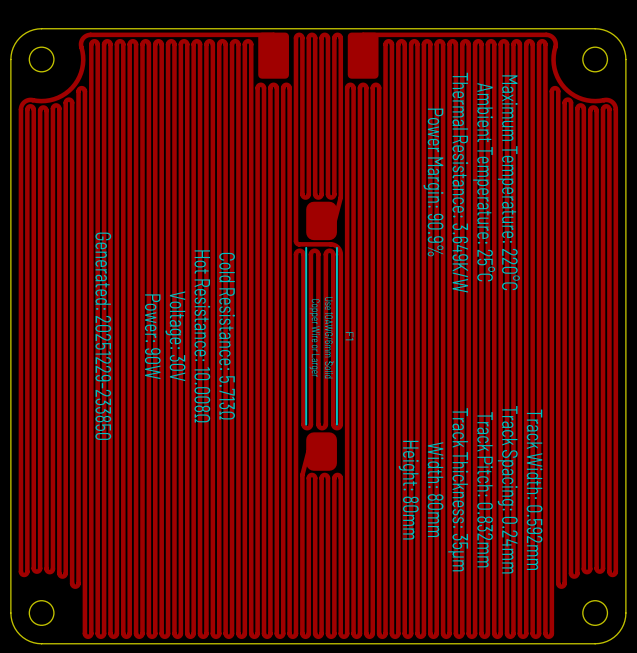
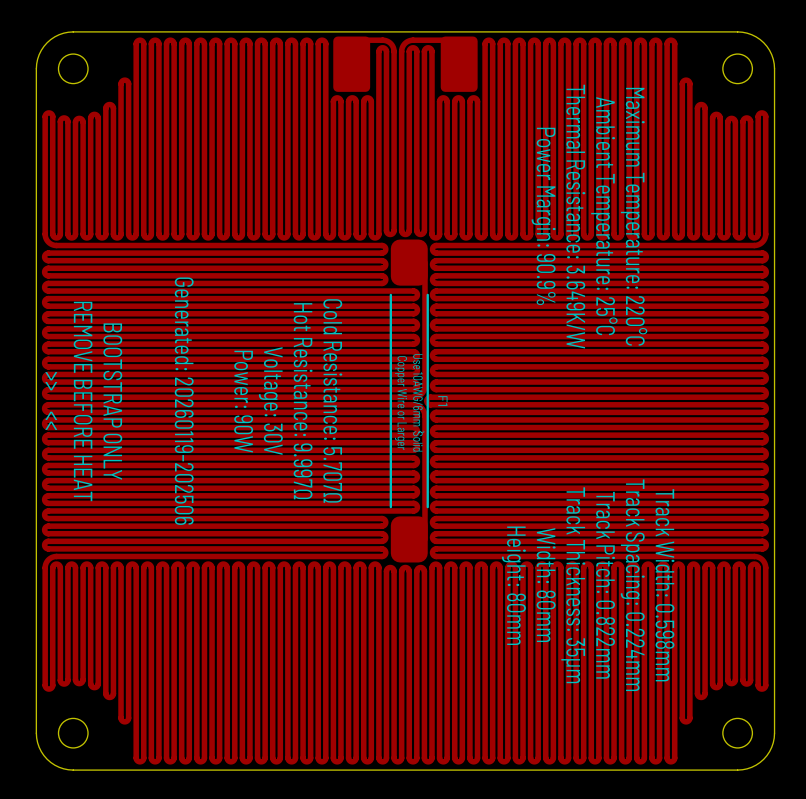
top track: none -> (355, 40) (385, 40) (390, 43) (393, 50) (394, 230) (392, 233) (388, 234) (386, 230) (386, 51) (382, 47) (378, 51) (378, 235) (374, 237) (371, 234) (371, 101) (367, 97) (363, 101) (363, 234) (359, 237) (356, 235) (356, 101) (352, 97) (348, 101) (348, 234) (345, 237) (341, 235) (340, 101) (337, 97) (333, 101) (333, 234) (330, 237) (326, 235) (325, 44) (322, 40) (318, 44) (318, 234) (315, 237) (310, 235) (310, 44) (306, 40) (303, 44) (303, 234) (300, 237) (295, 236) (295, 44) (291, 40) (287, 44) (287, 234) (285, 237) (280, 236) (280, 44) (276, 40) (272, 44) (272, 234) (269, 237) (265, 236) (265, 44) (261, 40) (257, 44) (257, 234) (254, 237) (250, 236) (249, 44) (246, 40) (242, 44) (242, 234) (240, 237) (235, 236) (234, 44) (231, 40) (227, 44) (227, 234) (224, 237) (220, 236) (219, 44) (215, 40) (212, 44) (212, 234) (209, 237) (205, 236) (204, 44) (200, 40) (196, 44) (196, 234) (194, 237) (190, 236) (189, 44) (185, 40) (181, 44) (181, 234) (179, 237) (175, 236) (174, 44) (170, 40) (166, 44) (166, 234) (164, 237) (160, 236) (158, 44) (155, 40) (151, 44) (151, 234) (149, 237) (145, 237) (143, 234) (143, 44) (139, 40) (136, 44) (135, 235) (131, 237) (128, 234) (128, 83) (124, 80) (121, 83) (120, 236) (116, 237) (113, 234) (113, 108) (109, 104) (105, 108) (105, 235) (101, 237) (98, 234) (98, 118) (94, 114) (90, 118) (90, 235) (86, 237) (83, 234) (83, 122) (79, 118) (75, 122) (75, 234) (72, 237) (68, 235) (67, 121) (64, 117) (60, 121) (60, 234) (57, 237) (53, 235) (52, 116) (48, 112) (45, 116) (45, 235) (49, 243) (56, 245) (381, 245) (385, 247) (384, 252) (48, 253) (44, 257) (48, 260) (381, 260) (385, 263) (384, 267) (48, 268) (44, 272) (48, 275) (381, 275) (385, 278) (384, 282) (48, 283) (44, 288) (48, 291) (413, 291) (417, 293) (416, 297) (48, 298) (44, 303) (48, 306) (413, 306) (417, 308) (416, 312) (48, 313) (44, 318) (48, 321) (413, 321) (417, 323) (416, 327) (48, 328) (44, 333) (48, 336) (413, 336) (417, 338) (416, 343) (48, 344) (44, 348) (48, 351) (413, 351) (417, 354) (416, 358) (48, 359) (44, 363) (48, 366) (413, 366) (416, 368) (416, 373) (48, 374) (44, 378) (48, 382) (413, 382) (416, 384) (416, 388) (48, 389) (45, 391) (44, 394) (48, 397) (417, 396) (423, 391) (424, 385) (424, 262)
top track: none -> (455, 40) (411, 40) (404, 43) (401, 49) (401, 230) (404, 234) (409, 230) (409, 51) (412, 47) (416, 51) (416, 230) (420, 234) (424, 230) (424, 51) (428, 47) (431, 51) (431, 234) (434, 237) (439, 234) (439, 101) (443, 97) (447, 101) (447, 235) (450, 237) (454, 234) (454, 101) (458, 97) (462, 101) (462, 235) (466, 237) (469, 234) (469, 101) (473, 97) (477, 101) (477, 234) (480, 237) (484, 235) (485, 44) (487, 40) (491, 40) (492, 44) (492, 234) (495, 237) (500, 234) (500, 44) (502, 40) (506, 40) (507, 44) (507, 234) (510, 237) (515, 234) (515, 44) (517, 40) (521, 40) (523, 44) (523, 234) (525, 237) (530, 234) (530, 44) (532, 40) (536, 40) (538, 44) (538, 234) (540, 237) (545, 234) (545, 44) (547, 40) (551, 40) (553, 44) (553, 234) (555, 237) (559, 237) (560, 234) (560, 44) (562, 40) (566, 40) (568, 44) (568, 234) (570, 237) (574, 237) (576, 234) (576, 44) (578, 40) (581, 40) (583, 44) (583, 234) (586, 237) (589, 237) (591, 234) (592, 40) (596, 40) (598, 44) (598, 234) (601, 237) (604, 237) (606, 234) (607, 40) (612, 40) (614, 44) (614, 234) (616, 237) (620, 237) (621, 234) (623, 40) (626, 40) (629, 44) (629, 234) (631, 237) (634, 237) (636, 234) (637, 41) (642, 40) (644, 44) (644, 234) (646, 237) (650, 237) (651, 234) (653, 41) (657, 40) (659, 44) (659, 234) (661, 237) (665, 237) (667, 234) (667, 41) (672, 40) (674, 44) (676, 237) (680, 237) (682, 234) (682, 81) (686, 80) (689, 83) (689, 234) (692, 237) (695, 237) (697, 234) (697, 106) (702, 104) (705, 107) (705, 234) (708, 237) (712, 234) (712, 116) (716, 114) (720, 117) (720, 234) (723, 237) (727, 234) (727, 121) (732, 118) (735, 121) (735, 234) (739, 237) (742, 234) (743, 121) (746, 118) (750, 120) (750, 234) (754, 237) (758, 234) (758, 116) (761, 112) (765, 115) (765, 234) (763, 241) (758, 244) (436, 245) (432, 249) (436, 253) (763, 253) (766, 257) (762, 260) (436, 260) (432, 264) (436, 268) (763, 268) (766, 272) (762, 275) (436, 275) (432, 279) (436, 283) (762, 283) (766, 287) (762, 290) (436, 291) (432, 294) (436, 298) (762, 298) (766, 302) (762, 306) (436, 306) (432, 309) (436, 313) (762, 313) (766, 317) (762, 321) (436, 321) (432, 325) (436, 328) (762, 328) (766, 332) (763, 336) (436, 336) (432, 340) (436, 344) (762, 344) (766, 347) (763, 351) (436, 351) (432, 355) (436, 359) (762, 359) (766, 362) (763, 366) (436, 366) (432, 370) (436, 374) (762, 374) (766, 377) (763, 381) (436, 382) (432, 385) (436, 389) (762, 389) (766, 392) (764, 396) (430, 397) (426, 401) (430, 404) (764, 405) (766, 409) (762, 412) (436, 412) (432, 416) (436, 419) (763, 420) (766, 424) (762, 427) (436, 427) (432, 431) (436, 435) (762, 435) (766, 439) (762, 442) (436, 442) (432, 446) (436, 450) (762, 450) (766, 454) (762, 457) (436, 457) (432, 461) (436, 465) (762, 465) (766, 469) (762, 473) (436, 473) (432, 476) (436, 480) (762, 480) (766, 483) (763, 488) (436, 488) (432, 492) (436, 495) (762, 495) (766, 500) (762, 503) (436, 503) (432, 507) (436, 510) (762, 511) (766, 515) (762, 518) (436, 518) (432, 522) (436, 526) (762, 526) (766, 529) (762, 533) (436, 533) (432, 537) (436, 541) (762, 541) (766, 544) (763, 548) (436, 548) (432, 552) (436, 556) (758, 557) (764, 562) (765, 567) (765, 687) (761, 689) (758, 685) (758, 567) (754, 564) (750, 567) (750, 680) (747, 684) (742, 680) (742, 566) (739, 564) (735, 567) (735, 679) (731, 683) (727, 679) (727, 567) (724, 564) (720, 566) (720, 683) (716, 687) (712, 683) (712, 567) (709, 564) (705, 566) (705, 693) (701, 697) (697, 693) (697, 567) (694, 564) (690, 566) (689, 718) (686, 721) (682, 718) (682, 567) (678, 564) (674, 566) (674, 758) (671, 761) (667, 758) (667, 567) (663, 564) (659, 567) (659, 758) (656, 761) (651, 758) (651, 567) (648, 564) (644, 567) (644, 758) (641, 761) (636, 758) (636, 567) (633, 564) (629, 567) (629, 758) (626, 761) (621, 758) (621, 567) (618, 564) (614, 567) (614, 758) (611, 761) (606, 758) (606, 567) (603, 564) (598, 567) (598, 758) (595, 761) (591, 758) (591, 567) (587, 564) (583, 567) (583, 758) (580, 761) (576, 758) (576, 567) (572, 564) (568, 567) (568, 758) (565, 761) (560, 758) (560, 567) (557, 564) (553, 567) (553, 758) (550, 761) (545, 758) (545, 567) (542, 564) (538, 567) (538, 758) (535, 761) (530, 758) (530, 567) (527, 564) (523, 567) (523, 758) (520, 761) (515, 758) (515, 567) (512, 564) (507, 567) (507, 758) (505, 761) (500, 758) (500, 567) (496, 564) (492, 567) (492, 758) (489, 761) (485, 758) (485, 567) (481, 564) (477, 567) (477, 758) (474, 761) (469, 758) (469, 567) (466, 564) (462, 567) (462, 758) (459, 761) (454, 758) (454, 567) (451, 564) (447, 567) (447, 758) (444, 761) (439, 758) (439, 567) (436, 564) (431, 567) (431, 758) (429, 761) (426, 761) (424, 758) (424, 571) (421, 567) (416, 571) (416, 758) (414, 761) (410, 761) (409, 758) (409, 571) (406, 567) (401, 571) (401, 758) (399, 761) (395, 761) (394, 758) (394, 571) (390, 567) (386, 571) (386, 758) (382, 761) (378, 758) (378, 567) (376, 564) (371, 567) (371, 758) (368, 761) (365, 761) (363, 758) (363, 567) (360, 564) (356, 567) (356, 758) (353, 761) (350, 761) (348, 758) (348, 567) (345, 564) (340, 567) (340, 758) (338, 761) (335, 761) (333, 758) (333, 567) (330, 564) (325, 567) (325, 758) (323, 761) (319, 761) (318, 758) (318, 567) (315, 564) (310, 567) (310, 758) (308, 761) (304, 761) (303, 758) (303, 567) (300, 564) (295, 567) (295, 758) (293, 761) (289, 761) (287, 758) (287, 567) (285, 564) (280, 567) (280, 758) (278, 761) (274, 761) (272, 758) (272, 567) (270, 564) (266, 564) (265, 567) (265, 758) (263, 761) (259, 761) (257, 758) (257, 567) (255, 564) (251, 564) (249, 567) (249, 758) (247, 761) (244, 761) (242, 758) (242, 567) (239, 564) (236, 564) (234, 567) (234, 758) (233, 761) (229, 761) (227, 758) (227, 567) (224, 564) (221, 564) (219, 567) (219, 758) (217, 761) (214, 761) (212, 758) (212, 567) (209, 564) (206, 564) (204, 567) (204, 758) (202, 761) (198, 761) (196, 758) (196, 567) (194, 564) (191, 564) (189, 567) (187, 761) (184, 761) (181, 758) (181, 567) (179, 564) (175, 564) (174, 567) (173, 760) (168, 761) (166, 758) (166, 567) (164, 564) (160, 564) (158, 567) (157, 760) (153, 761) (151, 758) (151, 567) (149, 564) (145, 564) (143, 567) (142, 760) (138, 761) (136, 758) (136, 567) (134, 564) (130, 564) (128, 567) (127, 720) (123, 721) (121, 718) (121, 567) (118, 564) (115, 564) (113, 567) (112, 695) (108, 697) (105, 694) (105, 567) (102, 564) (98, 567) (97, 685) (94, 687) (90, 684) (90, 567) (87, 564) (83, 567) (82, 680) (79, 683) (75, 680) (75, 567) (71, 564) (67, 567) (67, 680) (64, 684) (60, 681) (60, 567) (56, 564) (52, 567) (52, 685) (49, 689) (45, 686) (45, 566) (47, 560) (52, 557) (381, 556) (385, 552) (381, 548) (47, 548) (44, 545) (48, 541) (381, 541) (385, 537) (381, 533) (48, 533) (44, 529) (47, 526) (381, 526) (385, 522) (381, 518) (48, 518) (44, 515) (46, 511) (413, 510) (417, 507) (413, 503) (47, 503) (44, 499) (48, 495) (413, 495) (417, 492) (413, 488) (47, 488) (44, 484) (48, 480) (413, 480) (417, 476) (413, 473) (47, 473) (44, 469) (48, 465) (413, 465) (417, 461) (413, 457) (47, 457) (44, 454) (48, 450) (413, 450) (417, 446) (413, 442) (48, 442) (44, 438) (47, 435) (413, 435) (417, 431) (413, 427) (48, 427) (44, 424) (47, 420) (413, 419) (417, 416) (413, 412) (48, 412) (44, 409) (46, 405) (417, 405) (422, 409) (424, 416) (424, 539)
top track: (273, 55) (273, 34) (88, 35) (81, 41) (82, 68) (72, 87) (58, 97) (45, 100) (27, 100) (21, 107) (20, 572) (24, 574) (27, 571) (27, 109) (30, 106) (33, 109) (33, 568) (36, 571) (40, 568) (40, 110) (43, 107) (46, 110) (46, 568) (49, 572) (52, 569) (52, 108) (56, 105) (59, 108) (59, 573) (62, 576) (65, 573) (65, 102) (69, 99) (72, 102) (72, 583) (75, 586) (78, 583) (78, 91) (81, 88) (84, 90) (84, 633) (86, 636) (89, 636) (91, 633) (91, 42) (95, 41) (97, 44) (97, 633) (99, 636) (102, 636) (104, 633) (104, 42) (108, 41) (110, 44) (110, 633) (112, 636) (115, 636) (116, 633) (117, 42) (121, 41) (123, 44) (123, 633) (125, 636) (127, 636) (129, 633) (130, 42) (134, 41) (136, 44) (136, 633) (138, 636) (142, 633) (143, 42) (146, 41) (148, 44) (148, 633) (150, 636) (155, 633) (156, 42) (159, 41) (161, 44) (161, 633) (163, 636) (168, 633) (169, 42) (172, 41) (174, 44) (174, 633) (176, 636) (180, 633) (182, 41) (185, 41) (187, 44) (187, 633) (189, 636) (193, 633) (195, 41) (198, 41) (200, 44) (200, 633) (202, 636) (206, 633) (207, 41) (211, 41) (212, 44) (212, 633) (215, 636) (219, 633) (219, 44) (220, 41) (223, 41) (225, 44) (225, 633) (228, 636) (232, 633) (232, 44) (233, 41) (237, 41) (238, 44) (238, 633) (240, 636) (244, 633) (244, 44) (246, 41) (251, 44) (251, 633) (254, 636) (257, 633) (257, 88) (260, 84) (264, 88) (264, 633) (266, 636) (270, 633) (270, 88) (272, 84) (276, 88) (276, 633) (279, 636) (283, 633) (283, 88) (286, 84) (289, 88) (289, 633) (292, 636) (295, 633) (295, 254) (298, 250) (303, 254) (303, 425) (307, 428) (310, 424) (310, 254) (314, 250) (318, 254) (318, 424) (322, 428) (325, 424) (325, 254) (329, 250) (333, 254) (333, 424) (337, 428) (340, 424) (340, 251) (333, 244) (298, 244) (296, 241) (295, 38) (298, 34) (302, 38) (302, 194) (305, 197) (308, 194) (308, 37) (312, 34) (315, 38) (315, 194) (318, 197) (321, 194) (321, 37) (325, 34) (327, 38) (327, 194) (331, 197) (334, 194) (334, 38) (337, 34) (340, 37) (340, 197) (334, 220) (321, 220) -> none
top track: (363, 55) (363, 34) (548, 35) (555, 41) (554, 68) (564, 87) (582, 99) (607, 100) (614, 104) (615, 572) (611, 574) (609, 571) (609, 109) (606, 106) (603, 109) (603, 568) (599, 571) (596, 568) (596, 110) (593, 107) (590, 110) (590, 568) (587, 572) (583, 569) (583, 108) (580, 105) (577, 108) (577, 573) (574, 576) (571, 573) (571, 102) (567, 99) (564, 102) (564, 583) (561, 586) (558, 584) (558, 91) (554, 88) (551, 91) (551, 633) (549, 636) (546, 635) (545, 44) (543, 41) (539, 44) (538, 635) (534, 636) (532, 633) (532, 44) (530, 41) (527, 41) (526, 44) (525, 635) (521, 636) (519, 633) (519, 44) (518, 41) (515, 41) (513, 44) (512, 635) (509, 636) (507, 633) (507, 44) (505, 41) (500, 44) (499, 635) (496, 636) (494, 633) (494, 44) (492, 41) (487, 44) (486, 635) (483, 636) (481, 633) (481, 44) (479, 41) (475, 44) (474, 635) (470, 636) (468, 633) (468, 44) (466, 41) (462, 44) (460, 636) (457, 636) (455, 633) (455, 44) (453, 41) (449, 44) (448, 636) (444, 636) (443, 633) (443, 44) (440, 41) (436, 44) (435, 636) (432, 636) (430, 633) (430, 44) (427, 41) (423, 44) (423, 633) (422, 636) (419, 636) (417, 633) (417, 44) (415, 41) (411, 44) (411, 633) (409, 636) (406, 636) (404, 633) (404, 44) (402, 41) (398, 44) (398, 633) (396, 636) (391, 633) (391, 44) (389, 41) (385, 44) (385, 633) (383, 636) (379, 633) (379, 88) (376, 84) (372, 88) (372, 633) (370, 636) (366, 633) (366, 88) (363, 84) (359, 88) (359, 633) (357, 636) (353, 633) (353, 88) (350, 84) (347, 88) (347, 633) (344, 636) (340, 633) (340, 478) (337, 475) (334, 478) (334, 634) (330, 636) (327, 633) (327, 478) (324, 474) (321, 478) (321, 633) (317, 636) (315, 633) (315, 478) (311, 474) (308, 478) (308, 633) (305, 636) (302, 633) (302, 474) (308, 451) (321, 451) -> none
text: none -> >> << (51, 401)
text: none -> REMOVE BEFORE HEAT (83, 401)
text: none -> BOOTSTRAP ONLY (112, 401)
text: Generated: 20251229-233850 (103, 336) -> Generated: 20260119-202506 (184, 401)
text position: Power: 90W (152, 336) -> Power: 90W (243, 401)
text position: Voltage: 30V (175, 336) -> Voltage: 30V (270, 401)
text: Hot Resistance: 10.008Ω (202, 336) -> none
text: Cold Resistance: 5.713Ω (227, 336) -> Hot Resistance: 9.997Ω (303, 401)
text: none -> Cold Resistance: 5.707Ω (332, 401)
text: Track Pitch: 0.832mm (485, 489) -> Track Pitch: 0.822mm (605, 585)
text: Track Spacing: 0.24mm (507, 489) -> Track Spacing: 0.224mm (632, 585)
text: Track Width: 0.592mm (534, 489) -> Track Width: 0.598mm (664, 585)

